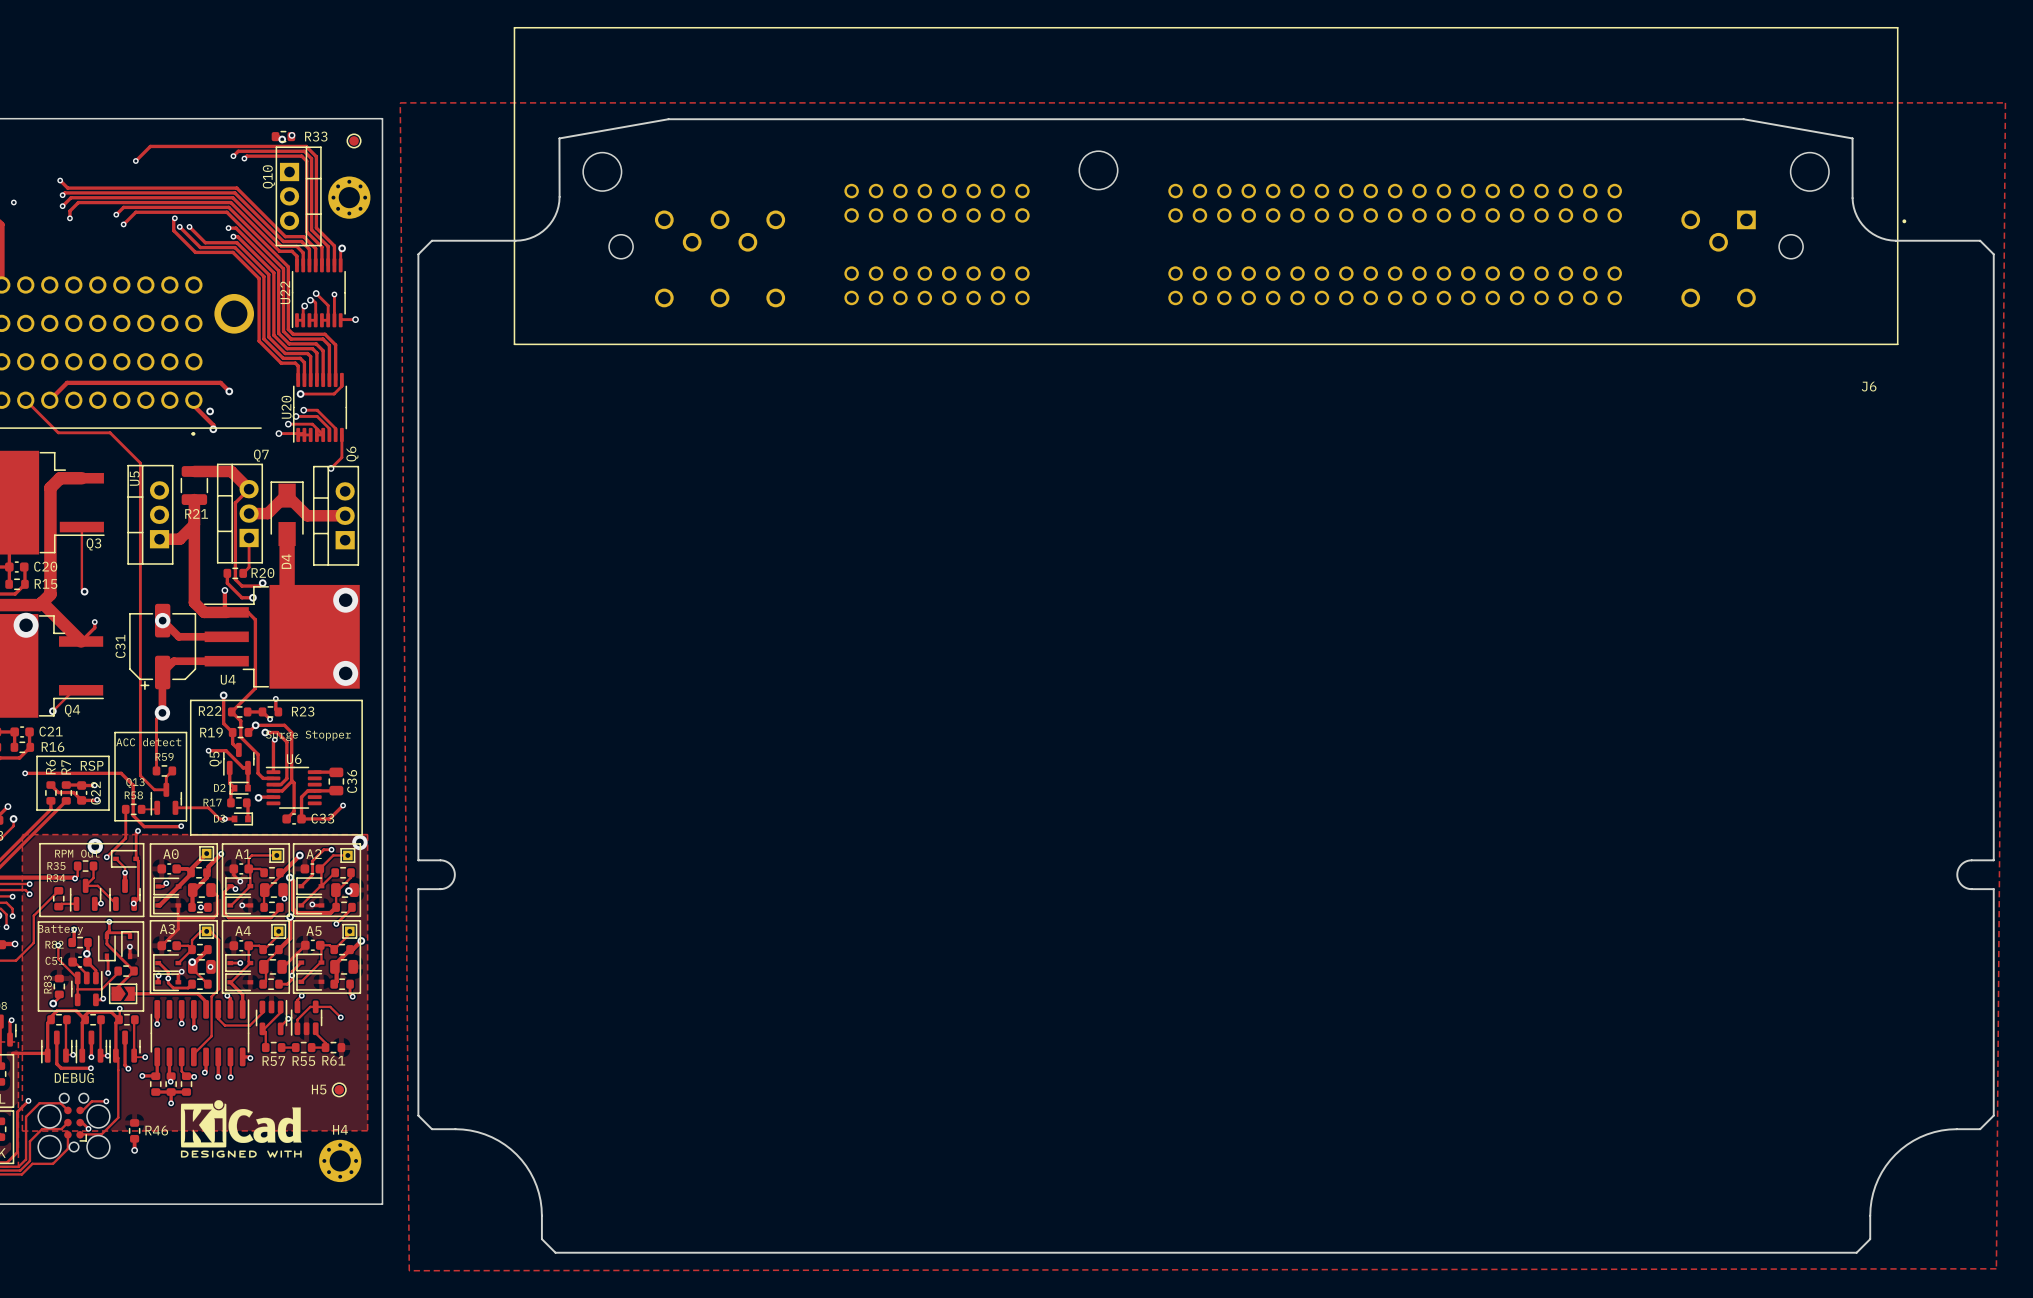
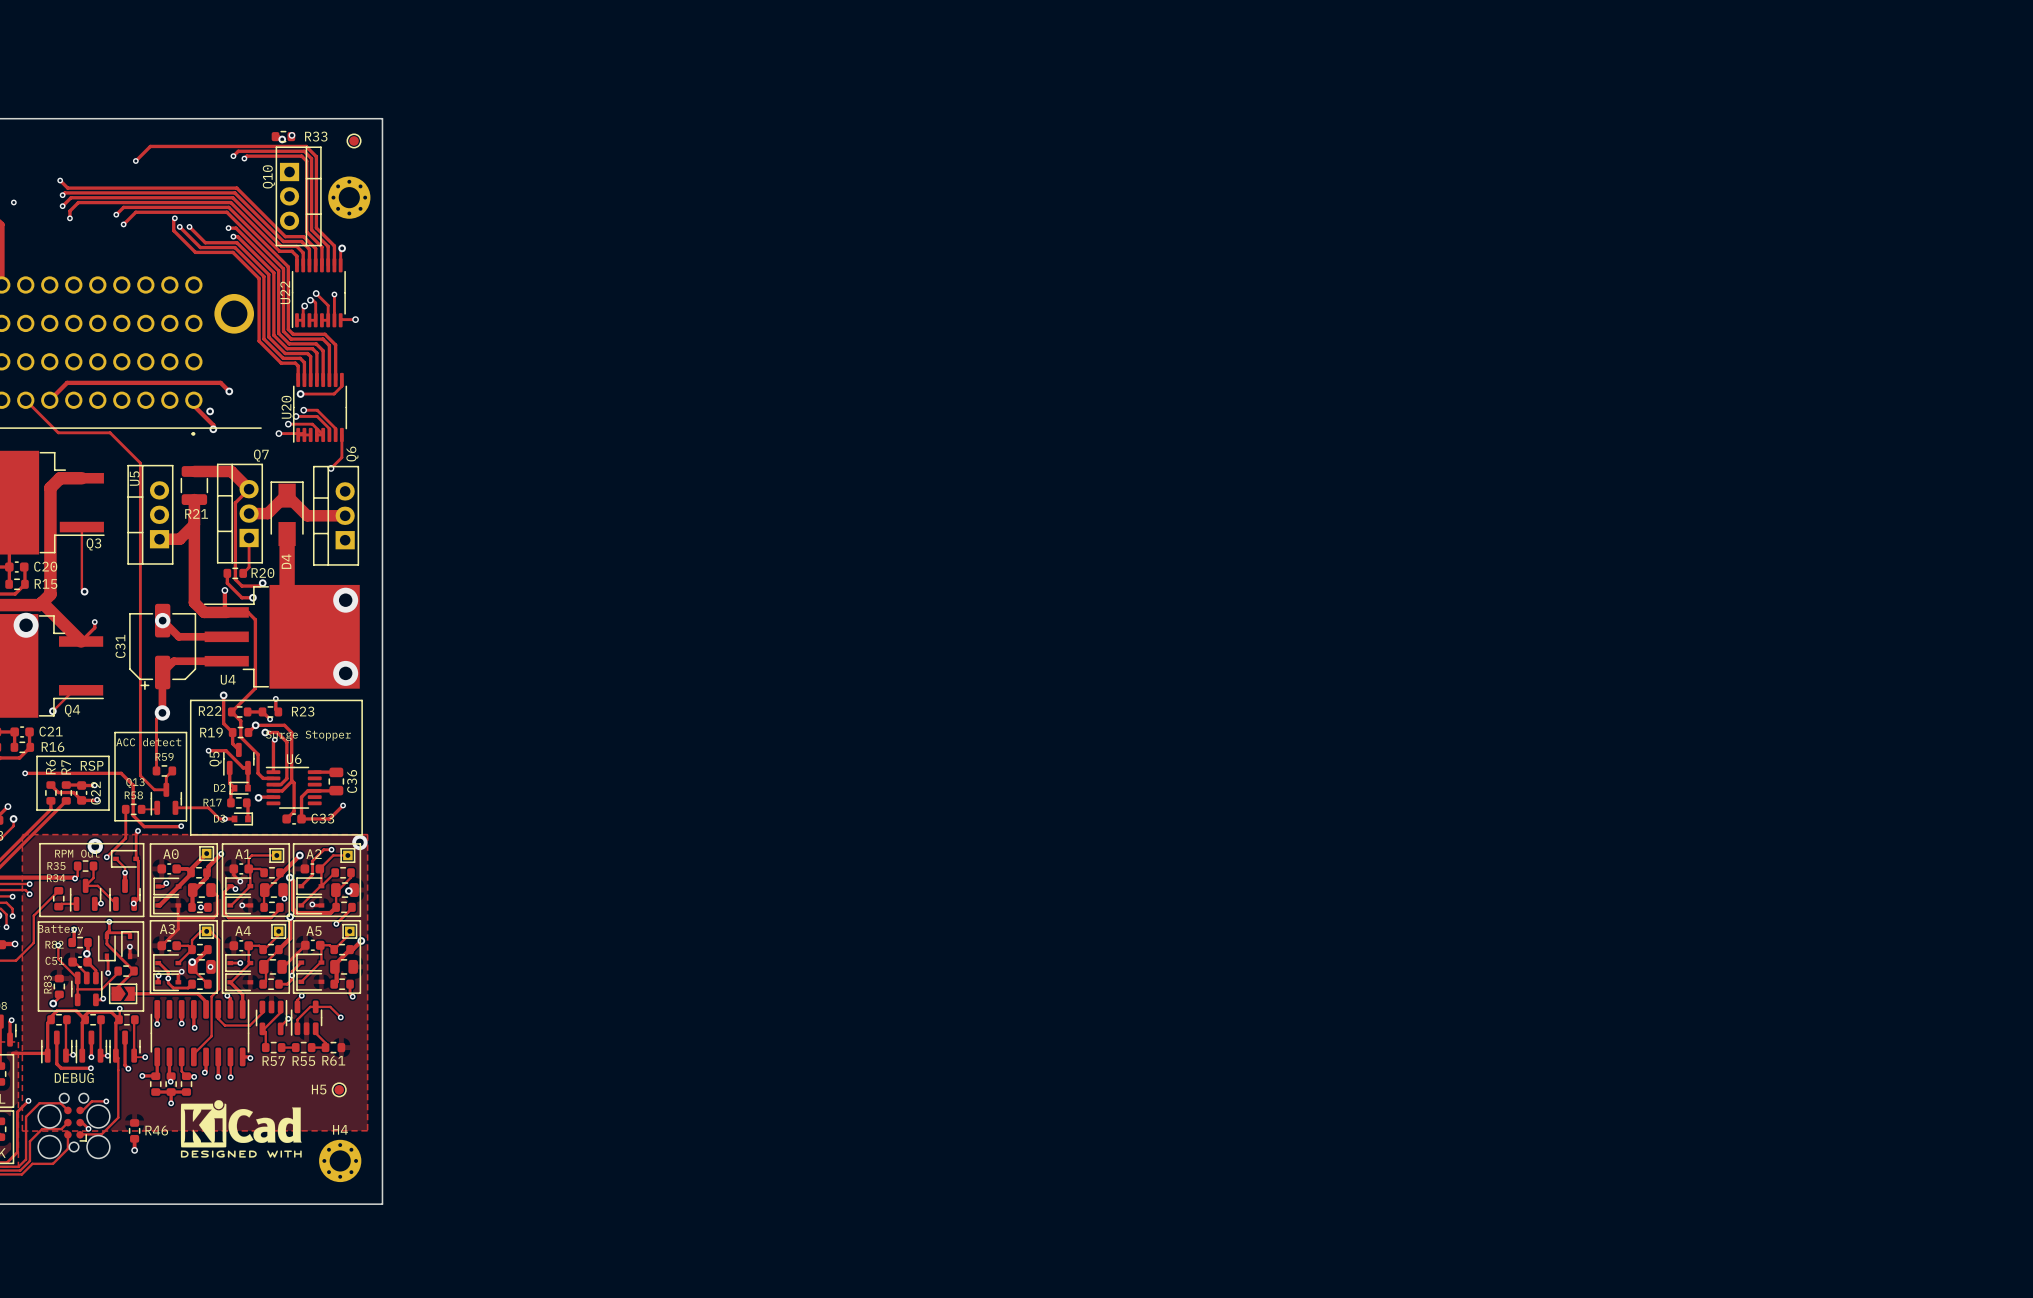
zone outline: (400, 102) (2005, 102) (1996, 1268) (409, 1270) (400, 102) -> none
board edge: (668, 119) (1743, 119) (1852, 138) (1852, 202) (1857, 216) (1869, 231) (1881, 238) (1890, 240) (1980, 240) (1993, 254) (1993, 860) (1966, 861) (1959, 866) (1957, 874) (1959, 882) (1966, 888) (1993, 889) (1993, 1115) (1980, 1129) (1949, 1129) (1934, 1132) (1913, 1140) (1895, 1154) (1881, 1172) (1873, 1193) (1870, 1208) (1870, 1239) (1856, 1252) (555, 1252) (541, 1239) (541, 1208) (538, 1193) (530, 1172) (516, 1154) (498, 1140) (477, 1132) (463, 1129) (431, 1129) (418, 1115) (418, 889) (445, 888) (452, 881) (454, 874) (452, 867) (445, 861) (418, 860) (418, 254) (431, 240) (515, 240) (534, 236) (549, 224) (558, 206) (559, 138) (668, 119) -> none
J6: (1210, 186) -> none

